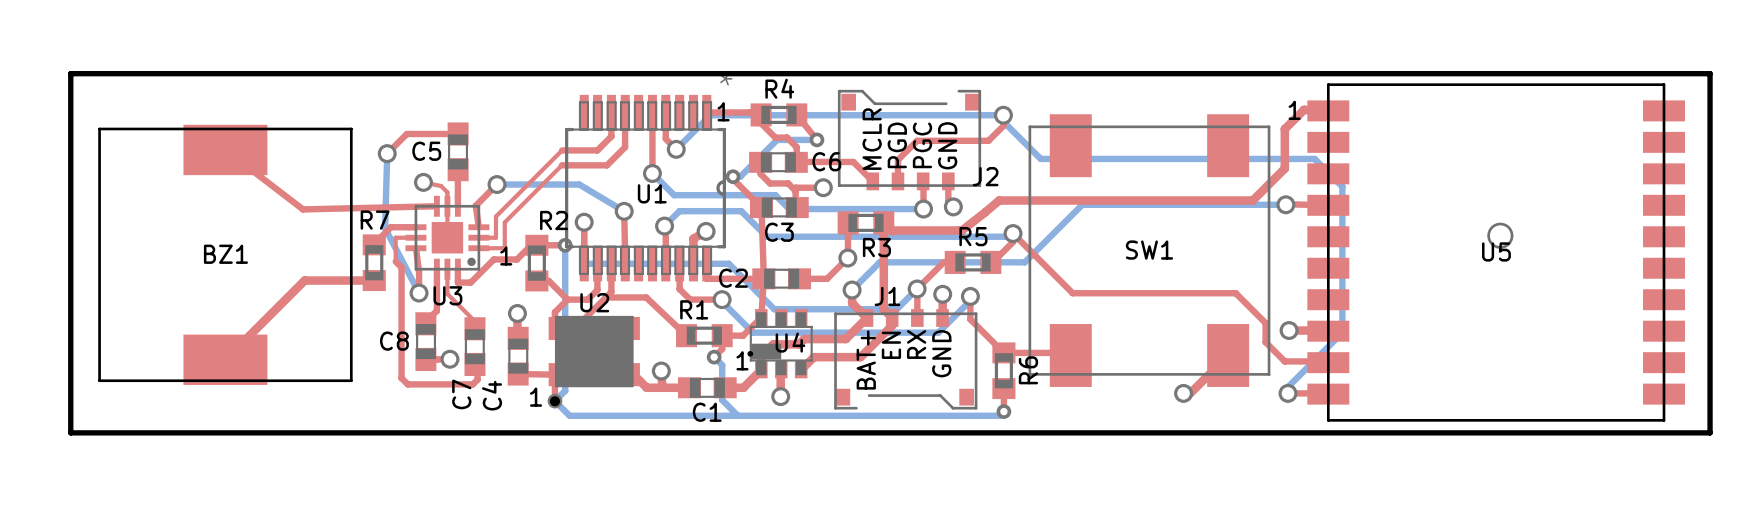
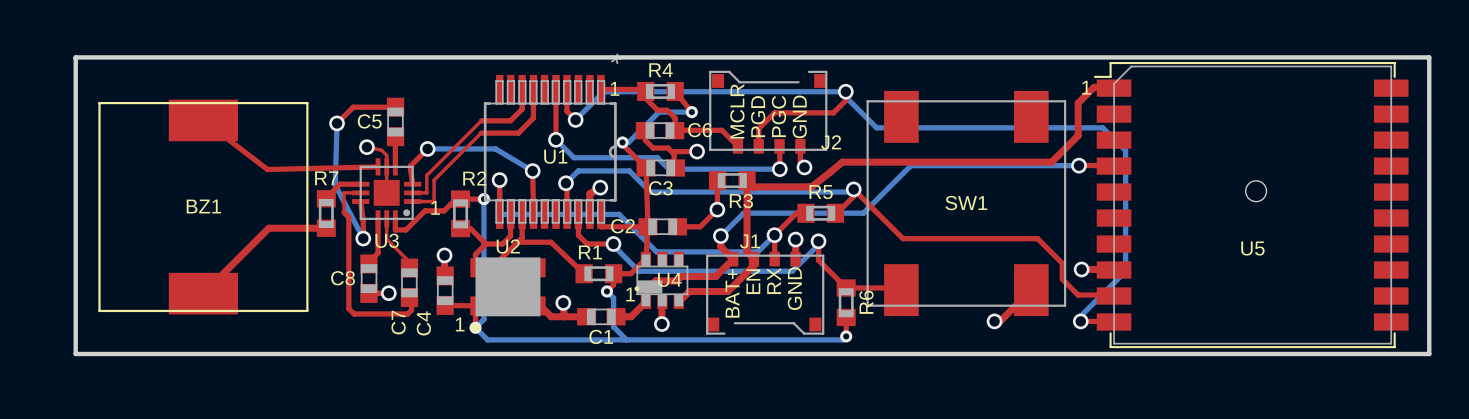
U5 footprint: [1307, 83, 1685, 422] -> [1093, 61, 1409, 349]
U5 name position: U5 (1496, 251) -> U5 (1252, 248)

